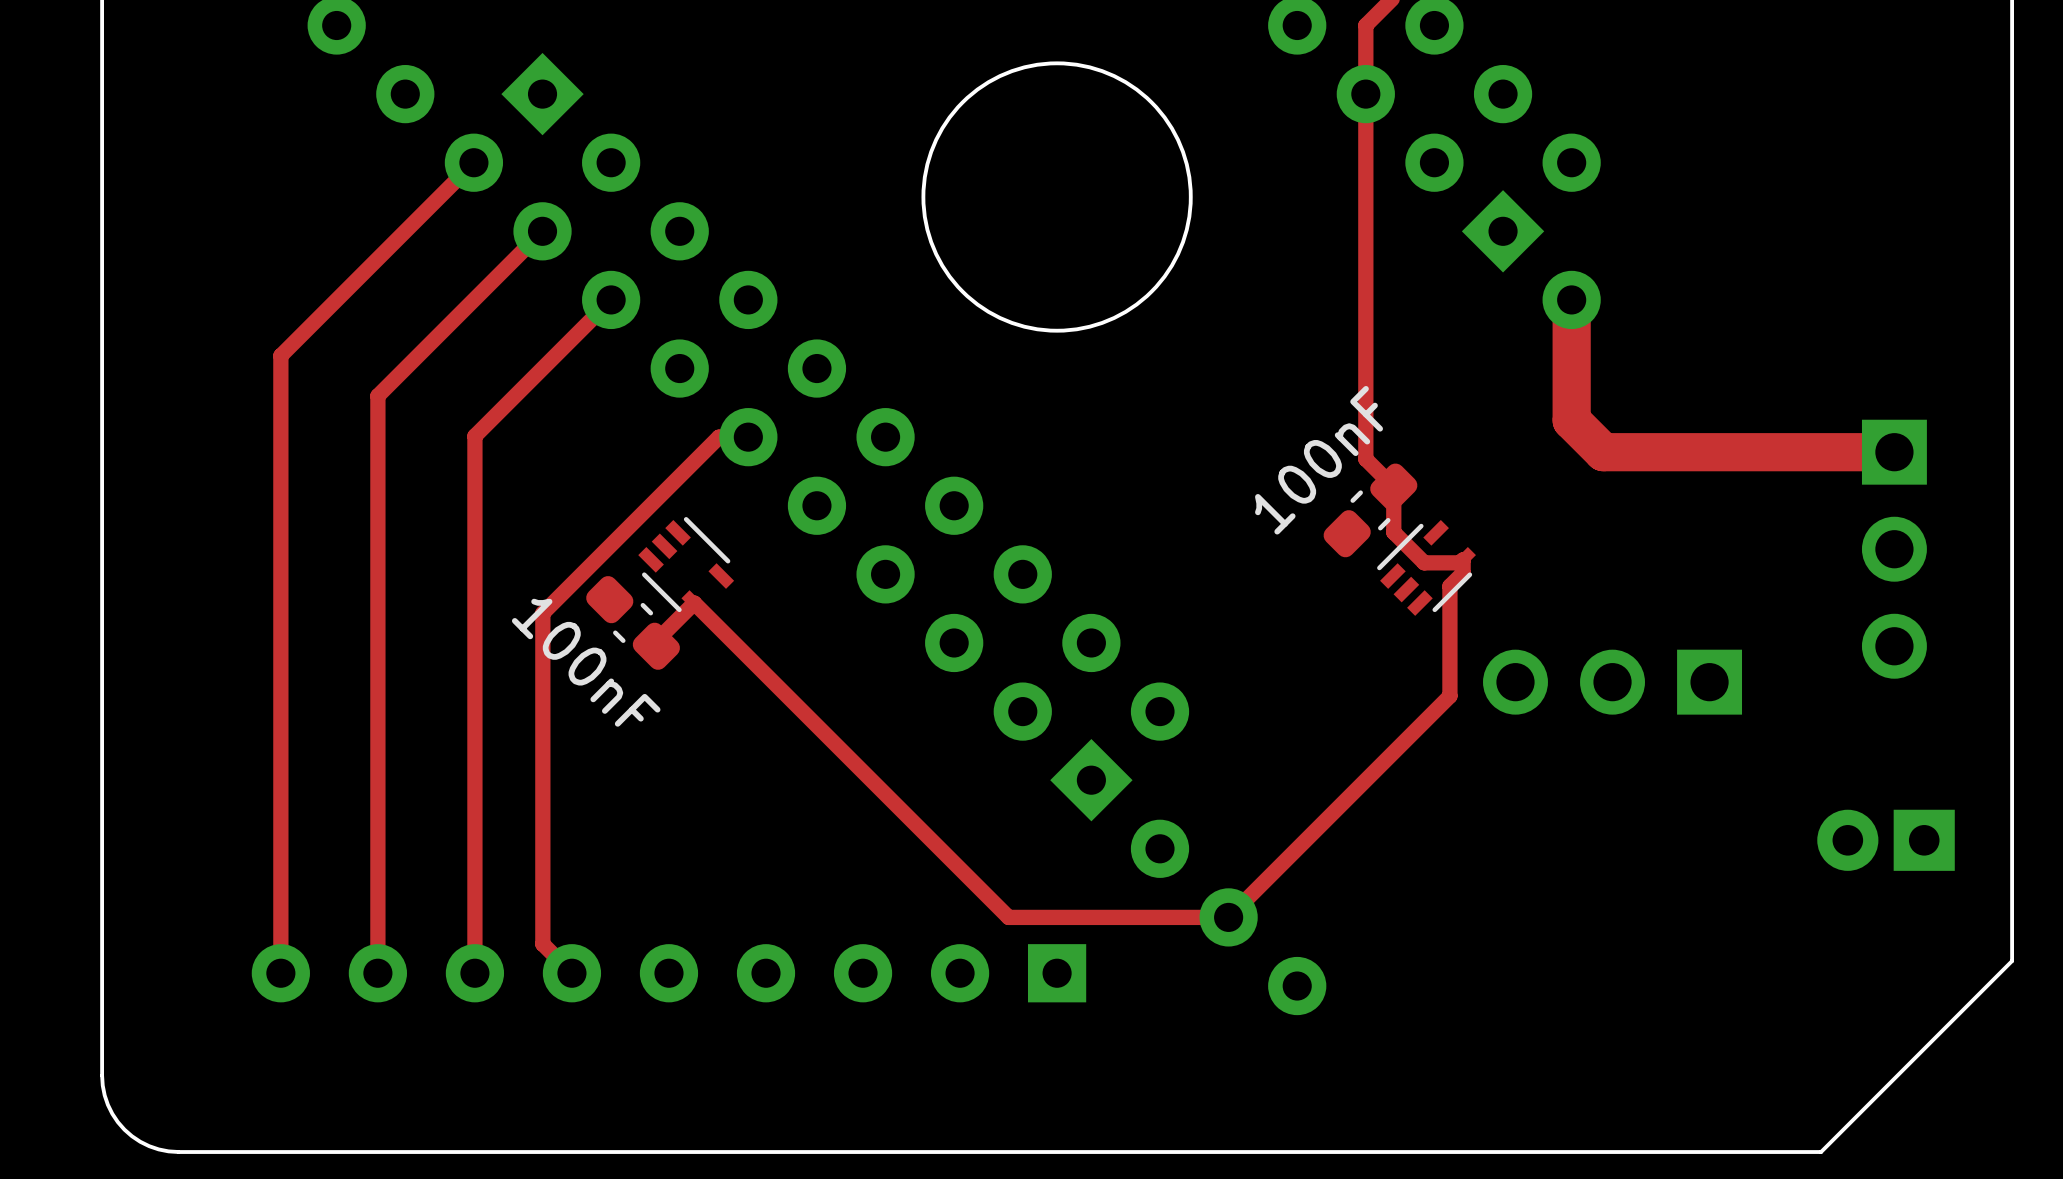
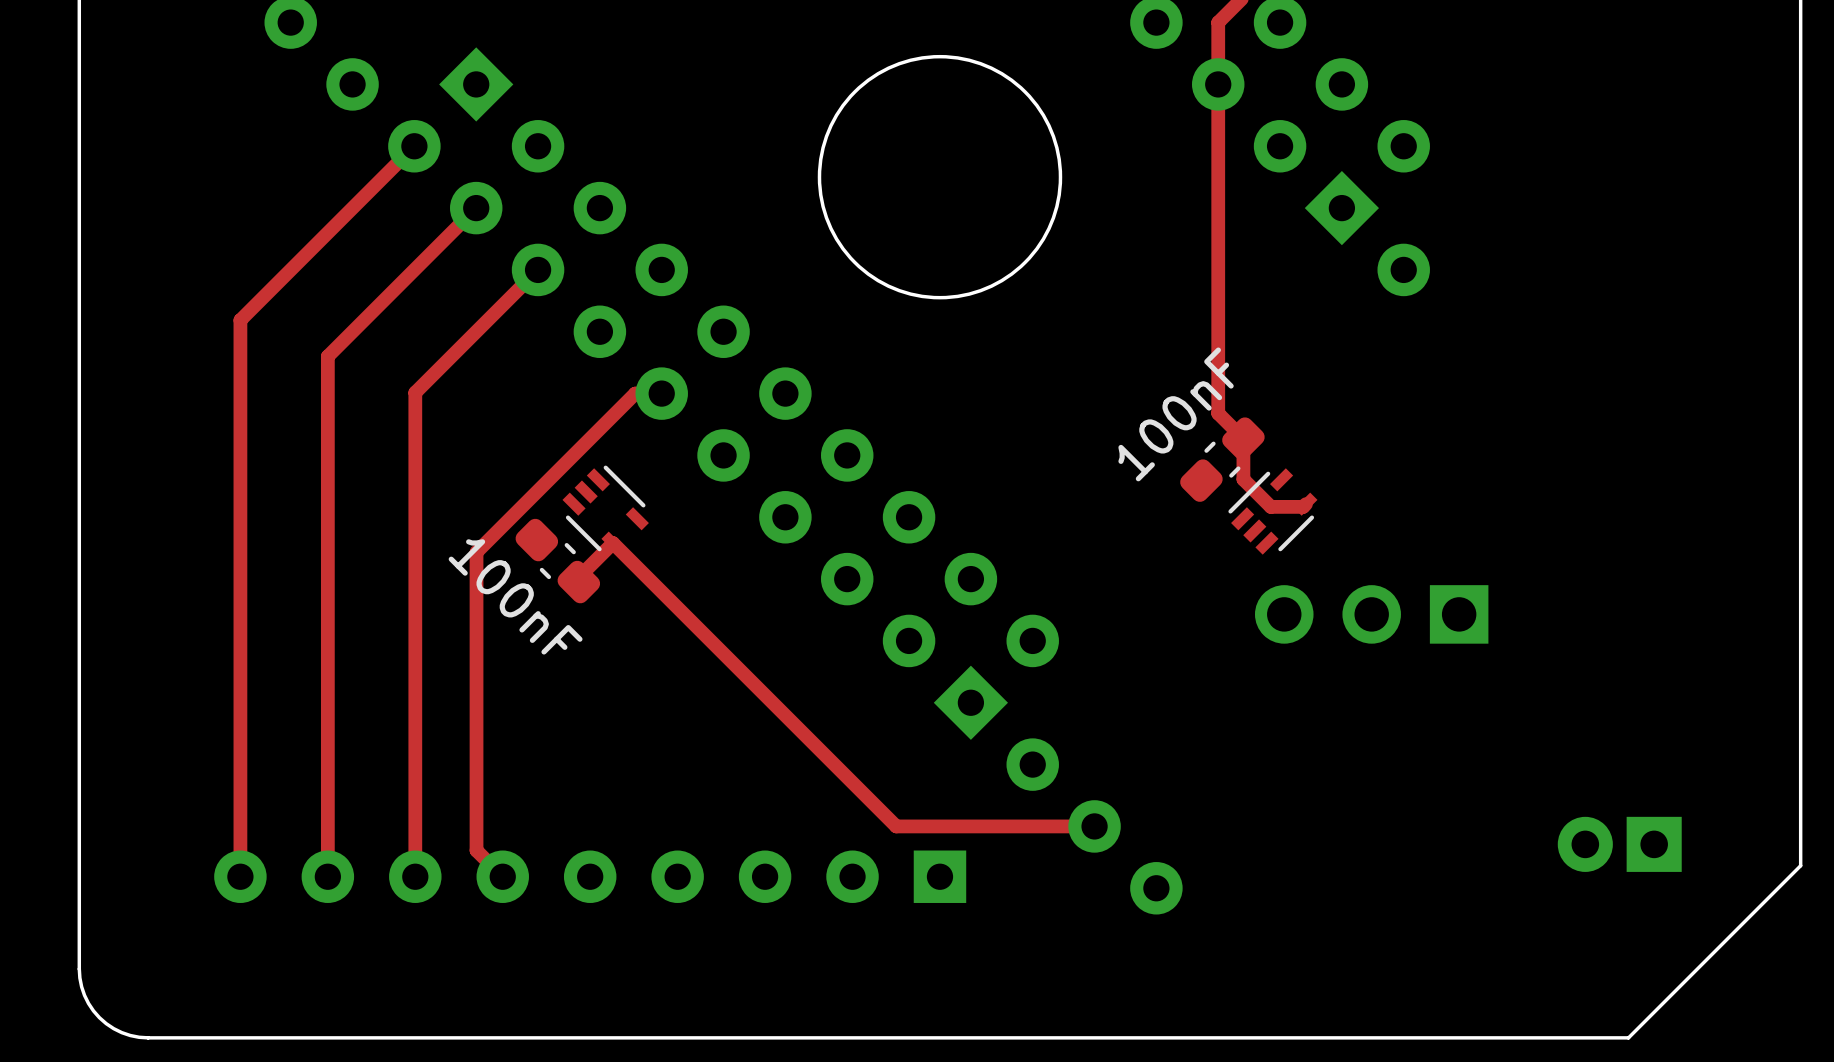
track: (1571, 299) (1571, 420) (1603, 452) (1894, 452) -> none
part: (1894, 549) -> none
track: (1463, 559) (1463, 573) (1449, 586) (1449, 696) (1228, 917) -> none
part position: (1612, 682) -> (1371, 614)
part position: (1886, 840) -> (1619, 844)

